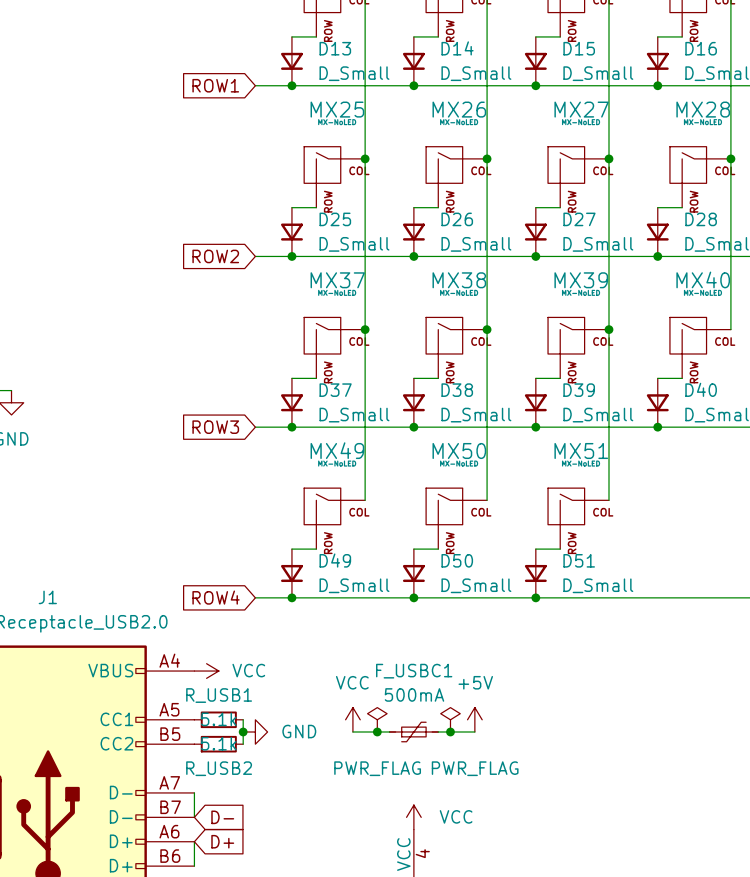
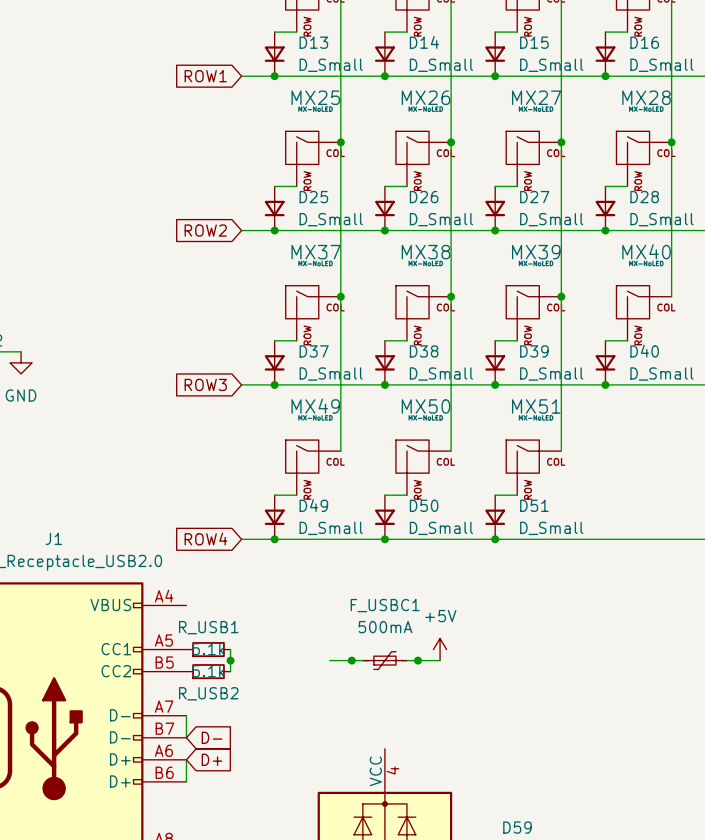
power symbol: VCC (206, 671) -> none
power symbol: VCC (352, 719) -> none
power symbol: PWR_FLAG (377, 719) -> none
power symbol: PWR_FLAG (450, 719) -> none
power symbol: GND (255, 731) -> none
power symbol: VCC (413, 817) -> none

